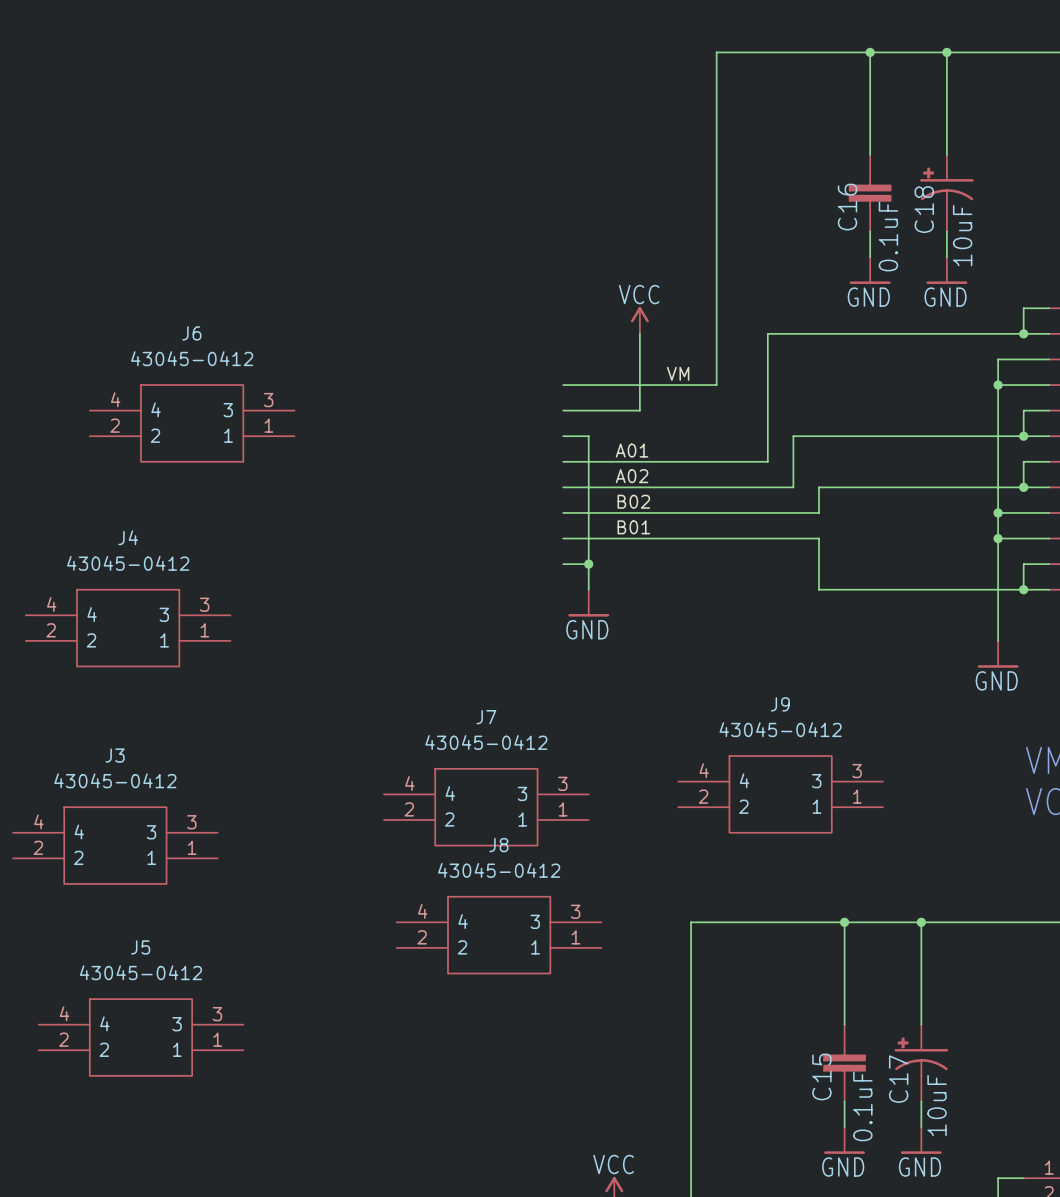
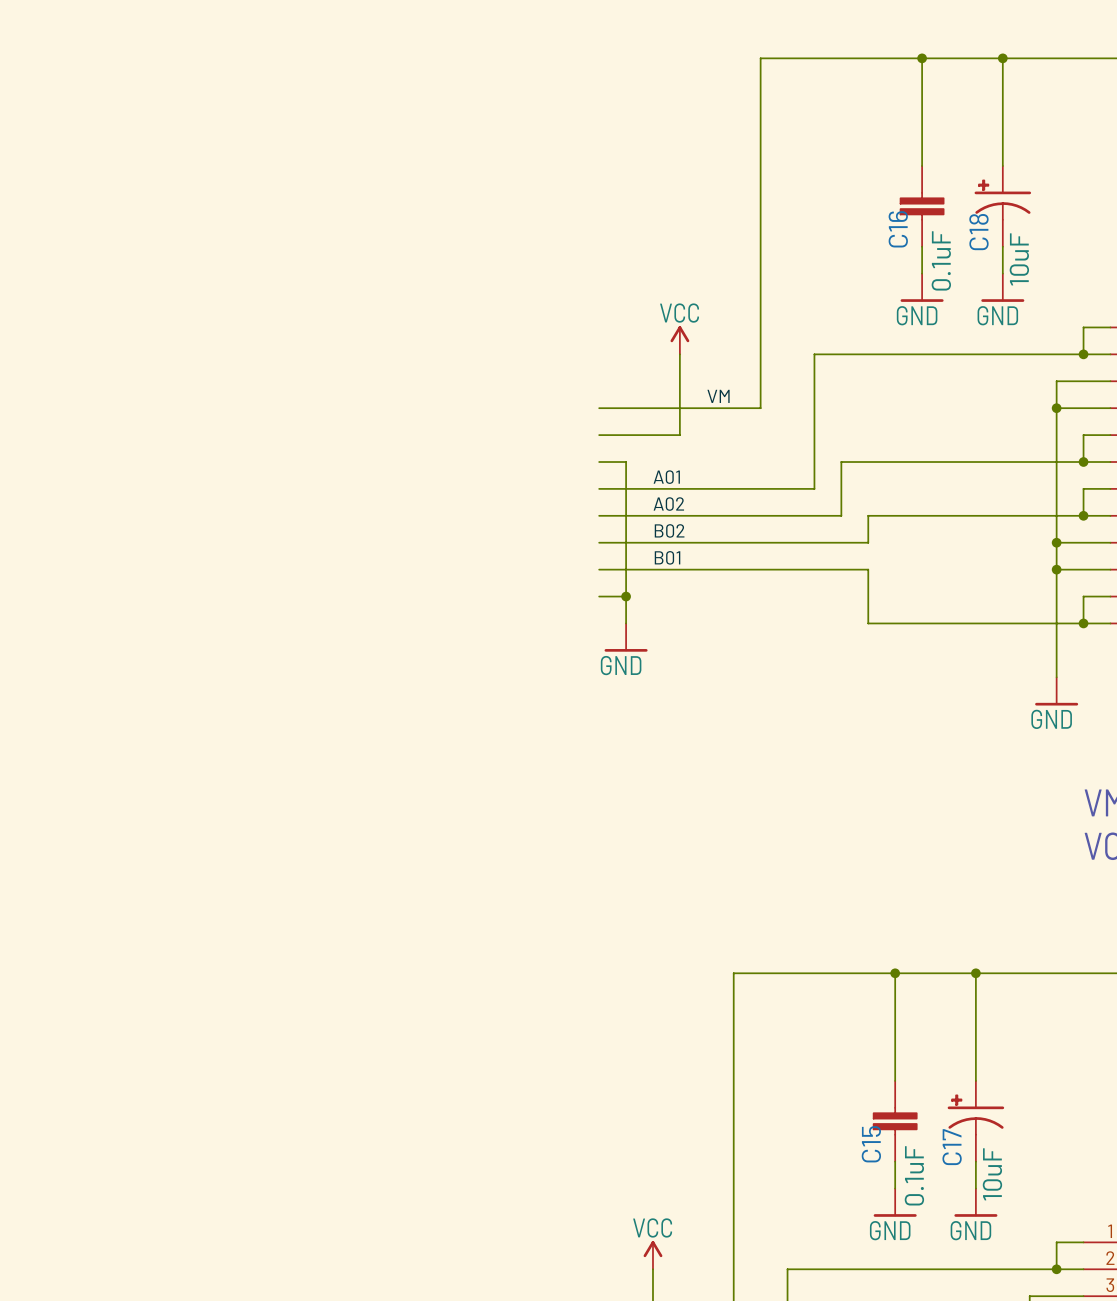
J6: 43045-0412 (192, 423) -> none
J4: 43045-0412 (128, 628) -> none
J9: 43045-0412 (780, 794) -> none
J7: 43045-0412 (486, 807) -> none
J3: 43045-0412 (115, 845) -> none
J8: 43045-0412 (499, 935) -> none
J5: 43045-0412 (140, 1037) -> none

